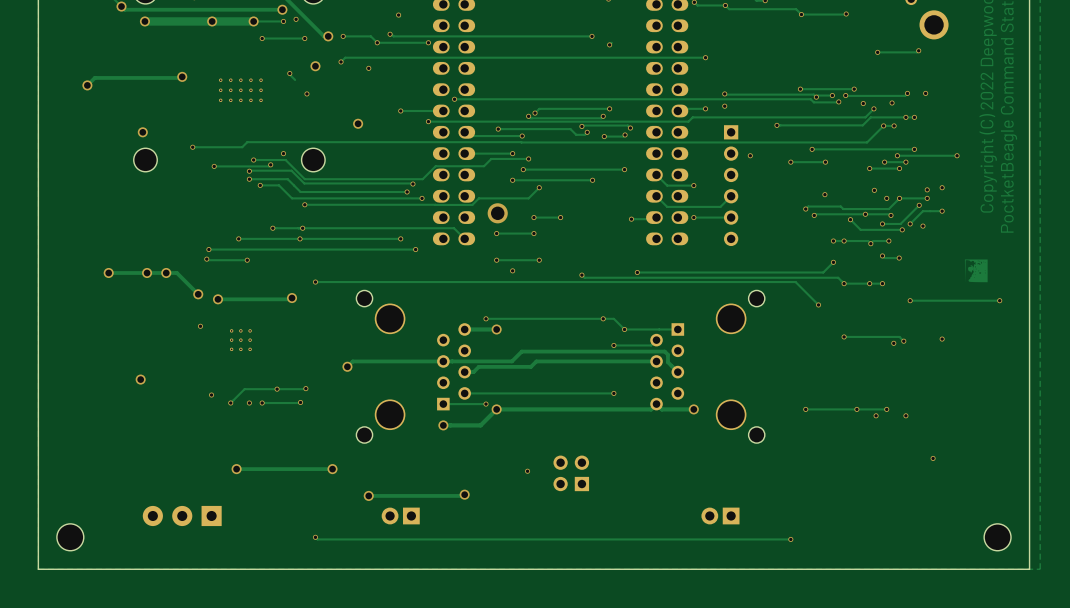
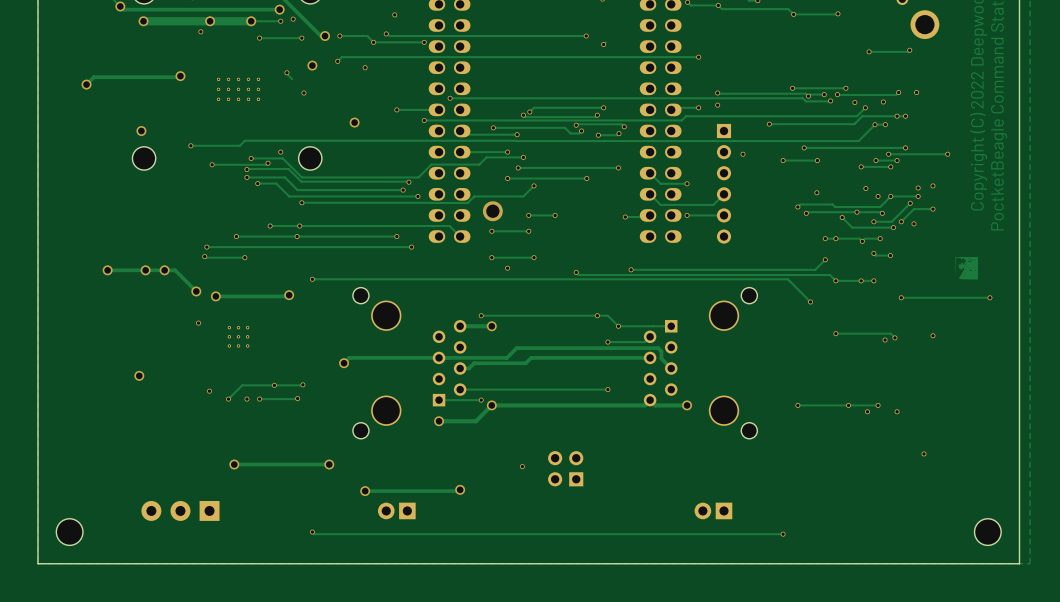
via: none -> (200, 31)

